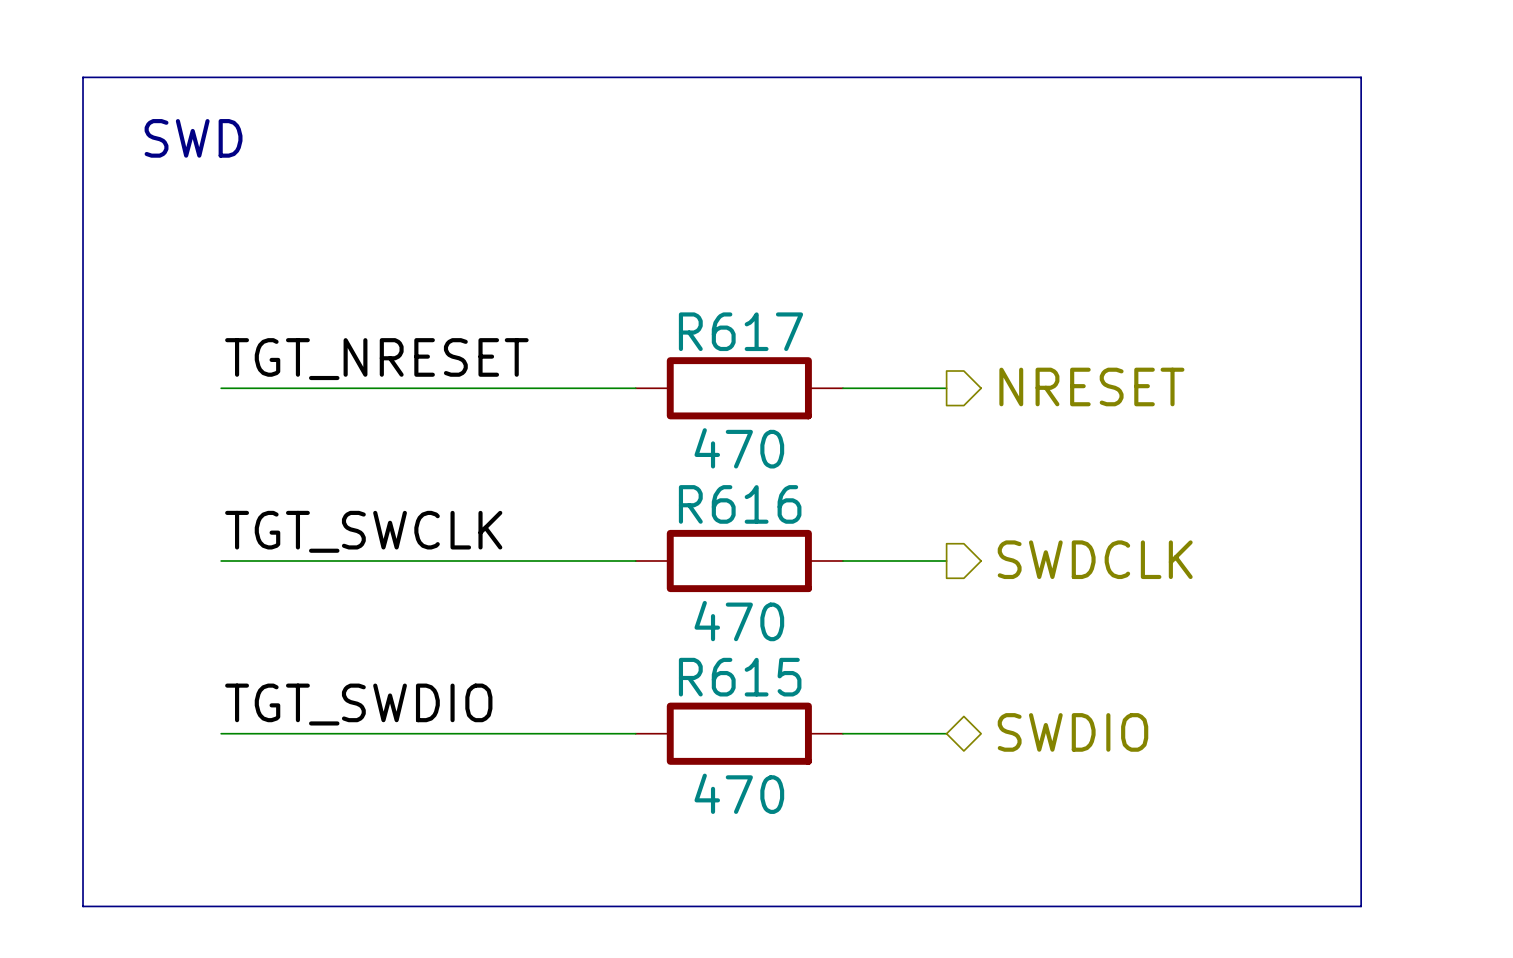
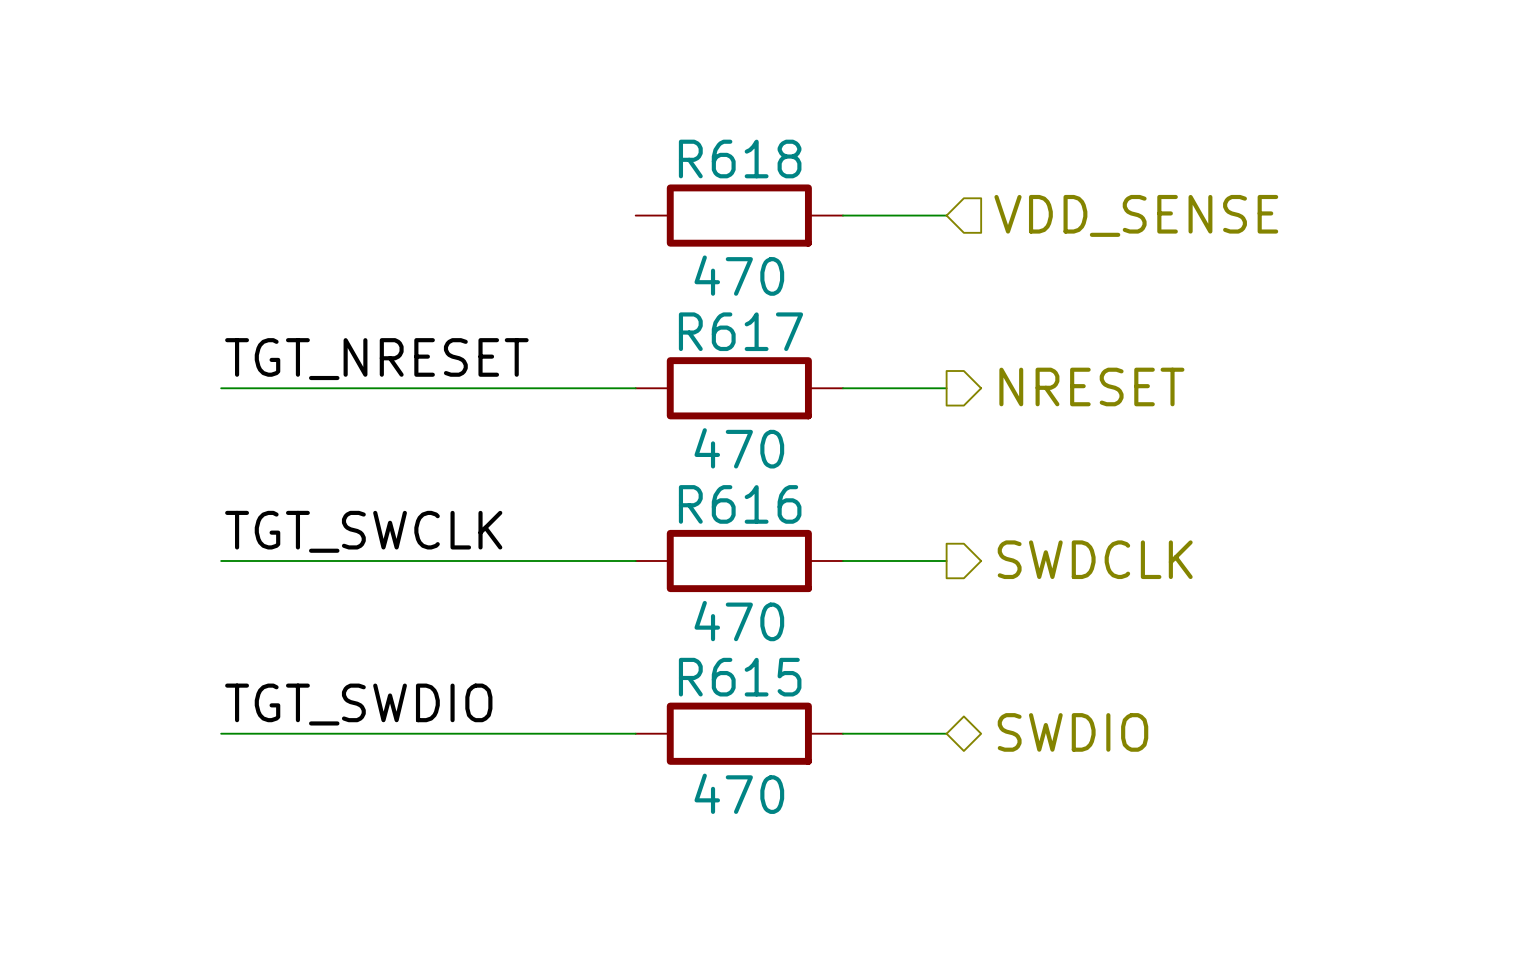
line: (83, 77) (1361, 77) (1361, 906) (83, 906) (83, 77) -> none
text: SWD (193, 138) -> none
R618: none -> 470 (739, 215)
wire: none -> (842, 215) (946, 215)
hierarchical label: none -> VDD_SENSE (1136, 215)

